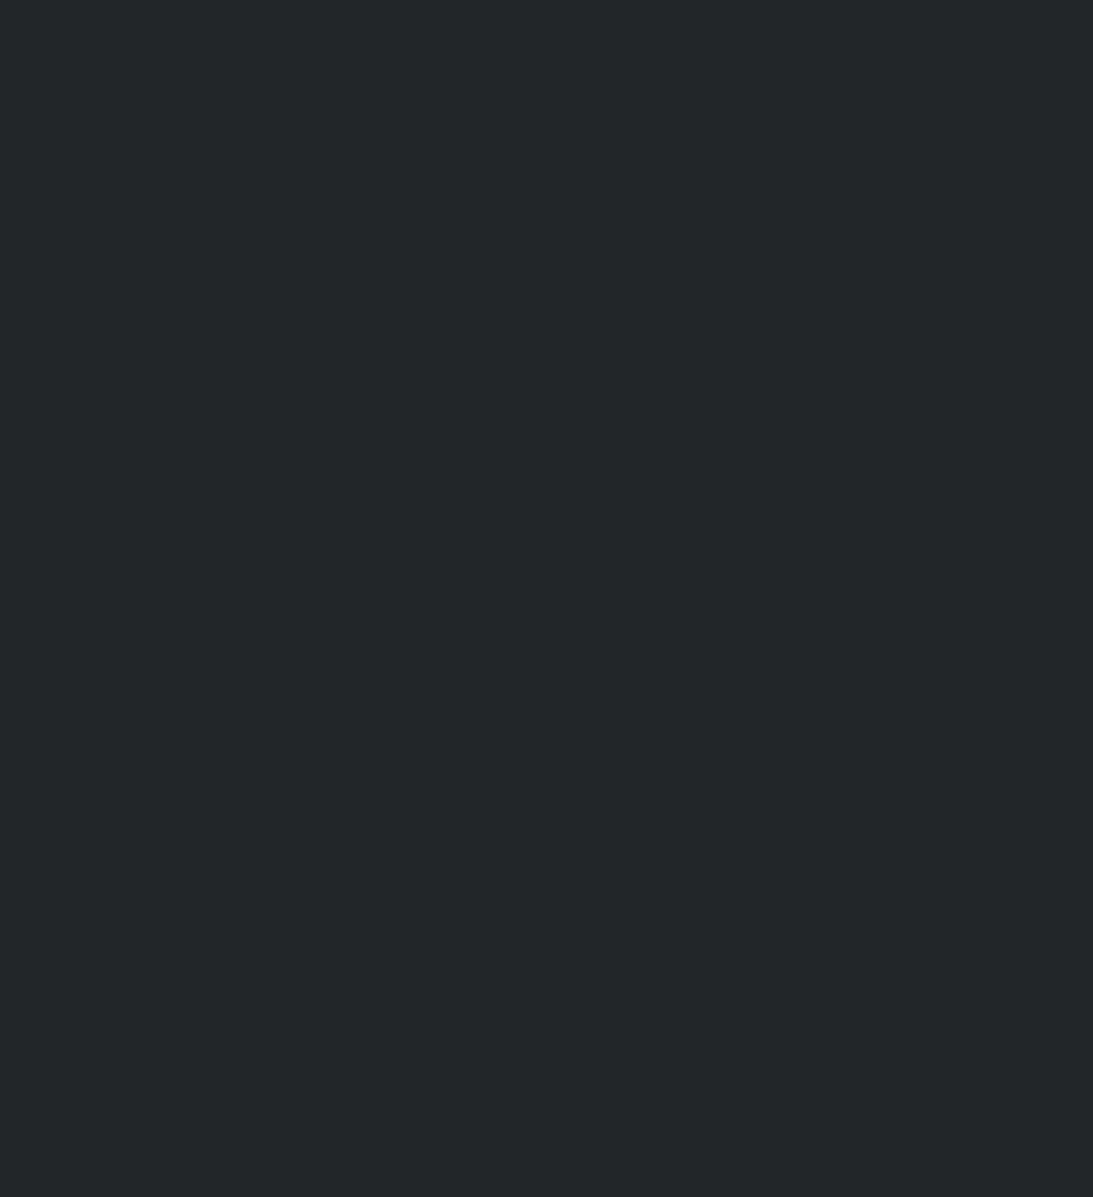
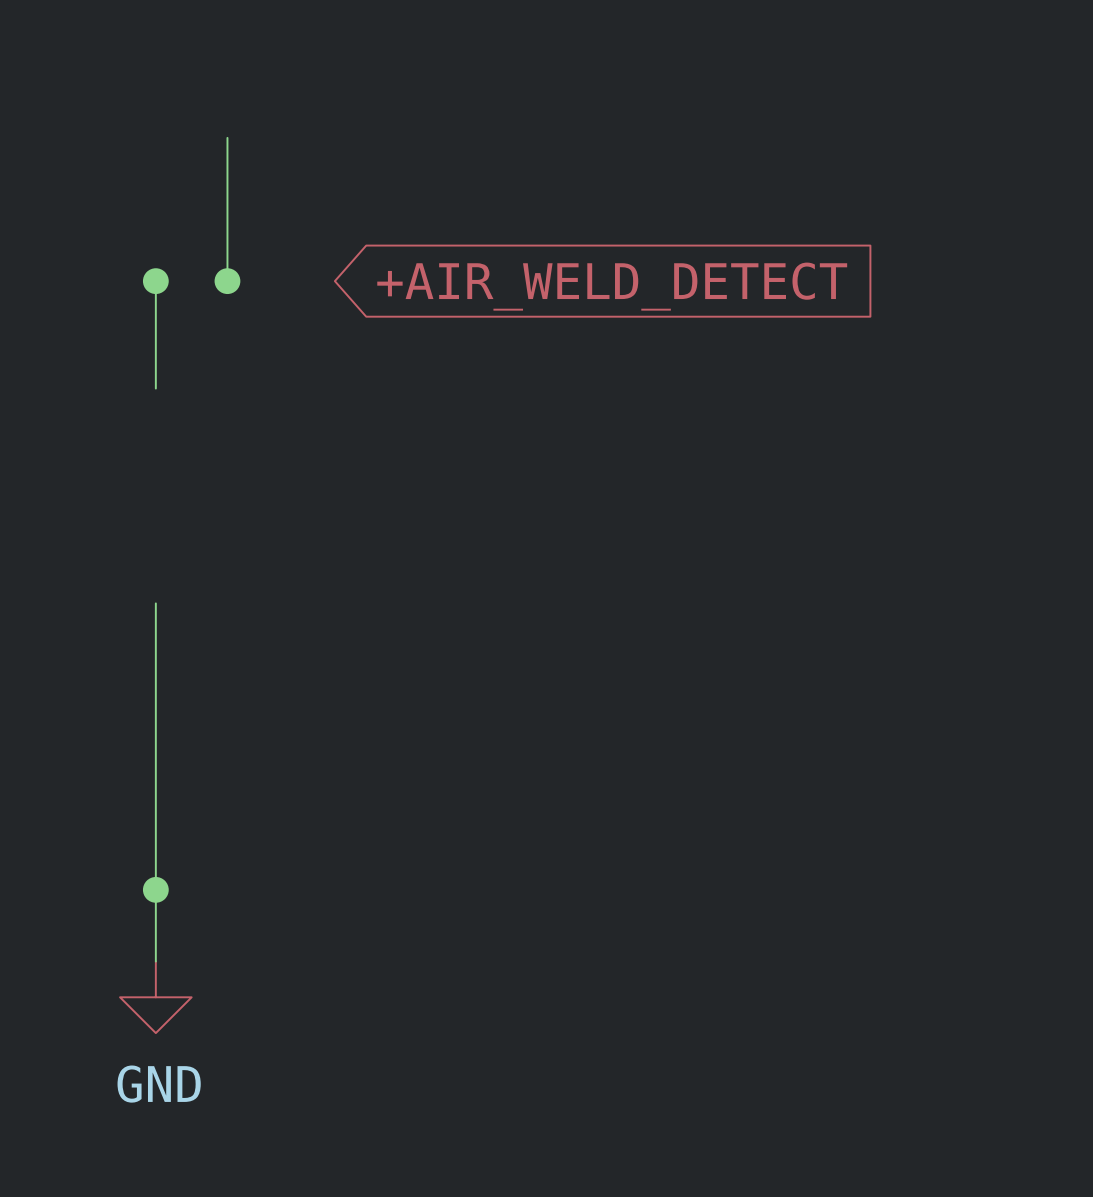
wire: none -> (227, 137) (227, 281)
wire: none -> (155, 281) (155, 388)
junction: none -> (155, 281)
junction: none -> (227, 281)
global label: none -> +AIR_WELD_DETECT (612, 286)
wire: none -> (155, 603) (155, 961)
junction: none -> (155, 889)
power symbol: none -> GND (155, 997)

